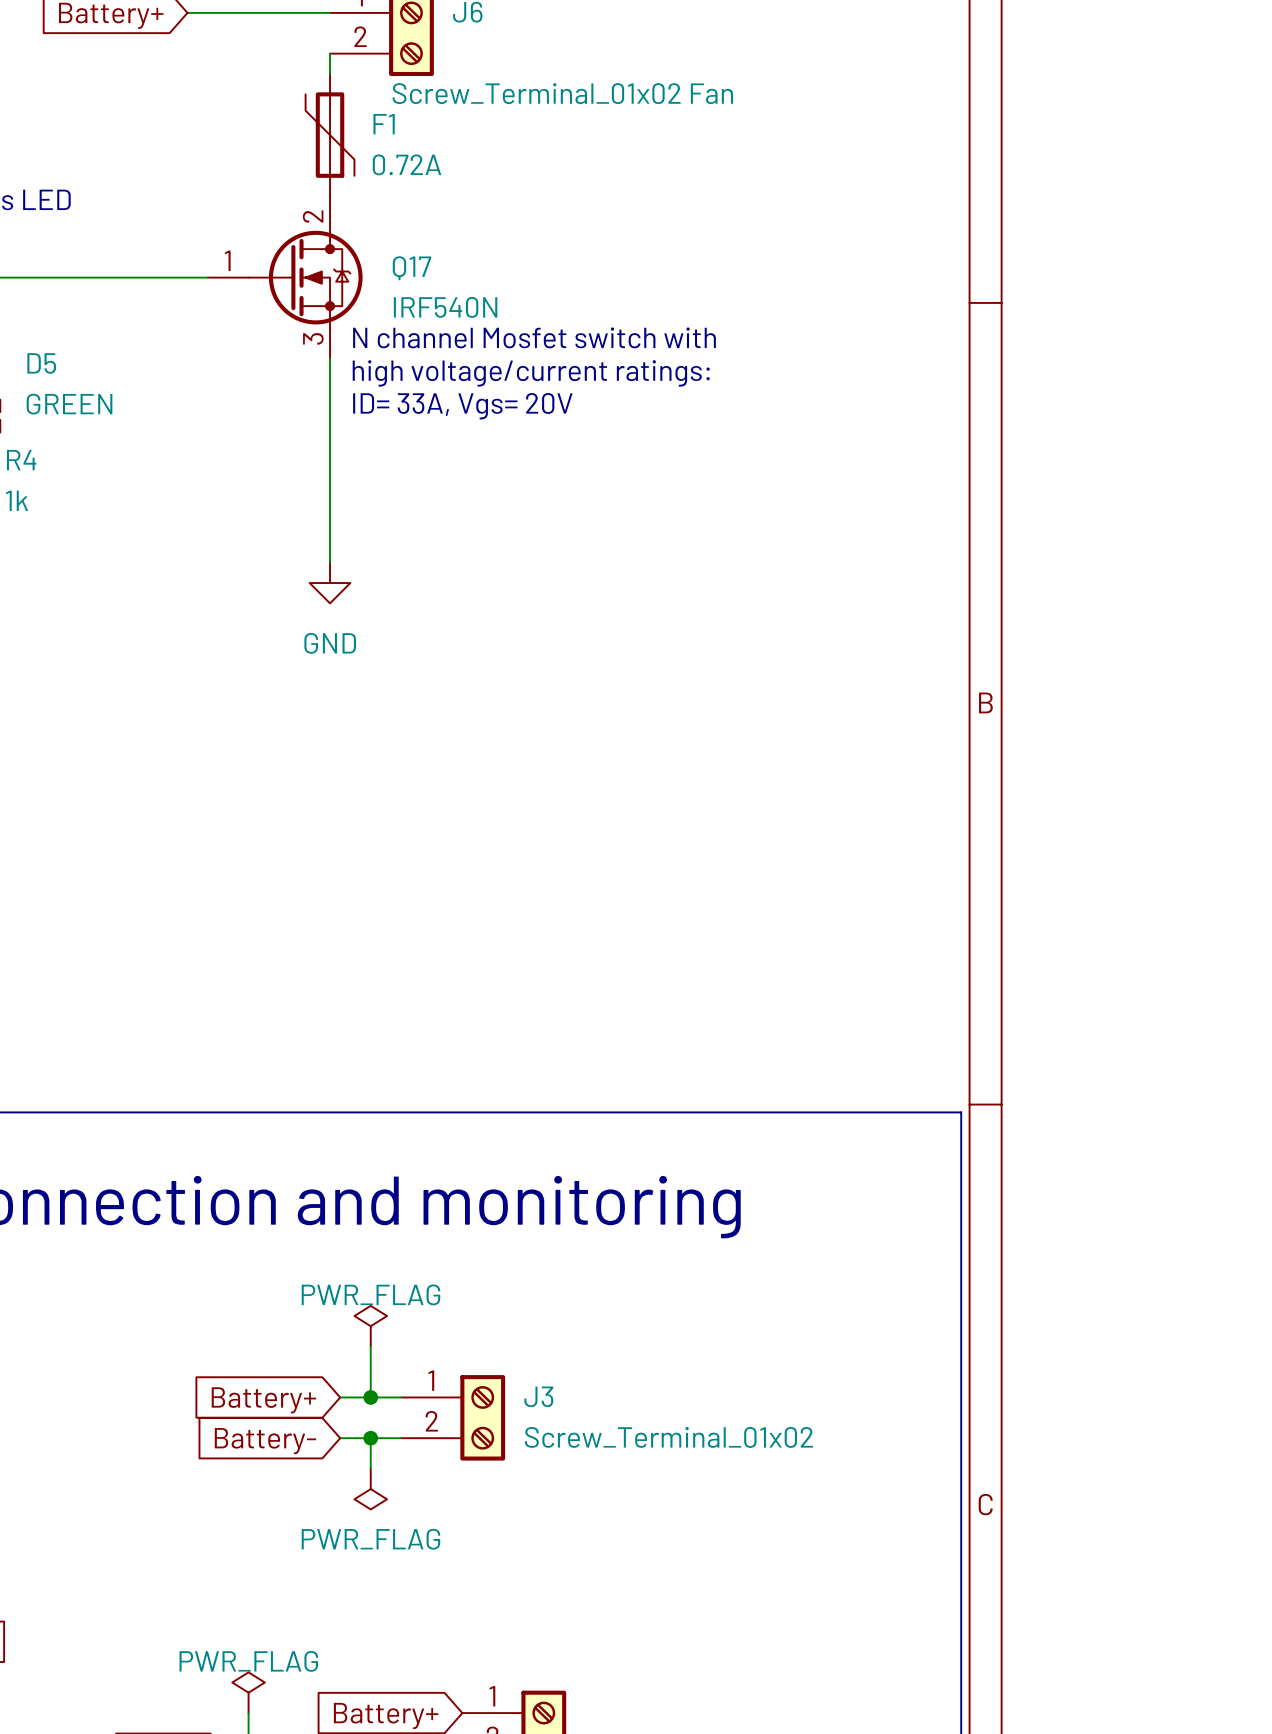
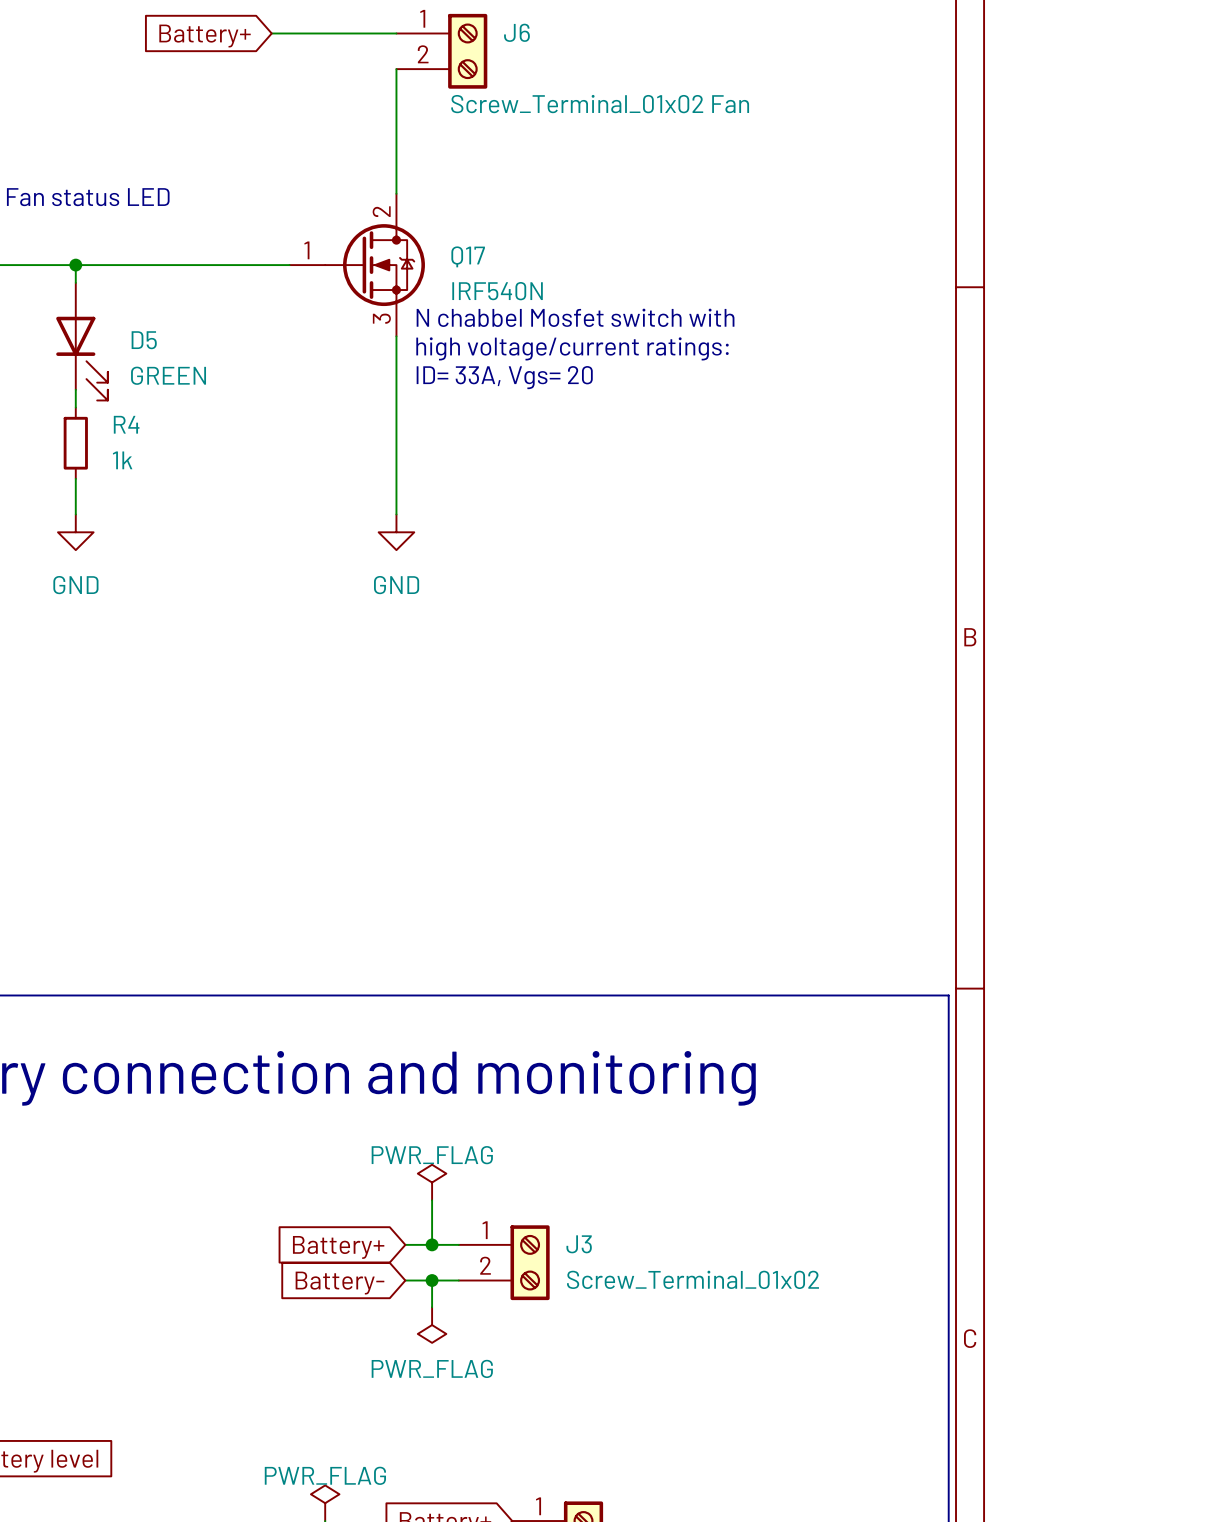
F1: 0.72A (330, 135) -> none
text: N channel Mosfet switch with (534, 337) -> N chabbel Mosfet switch with (575, 317)
text: ID= 33A, Vgs= 20V (462, 406) -> ID= 33A, Vgs= 20 (504, 377)

